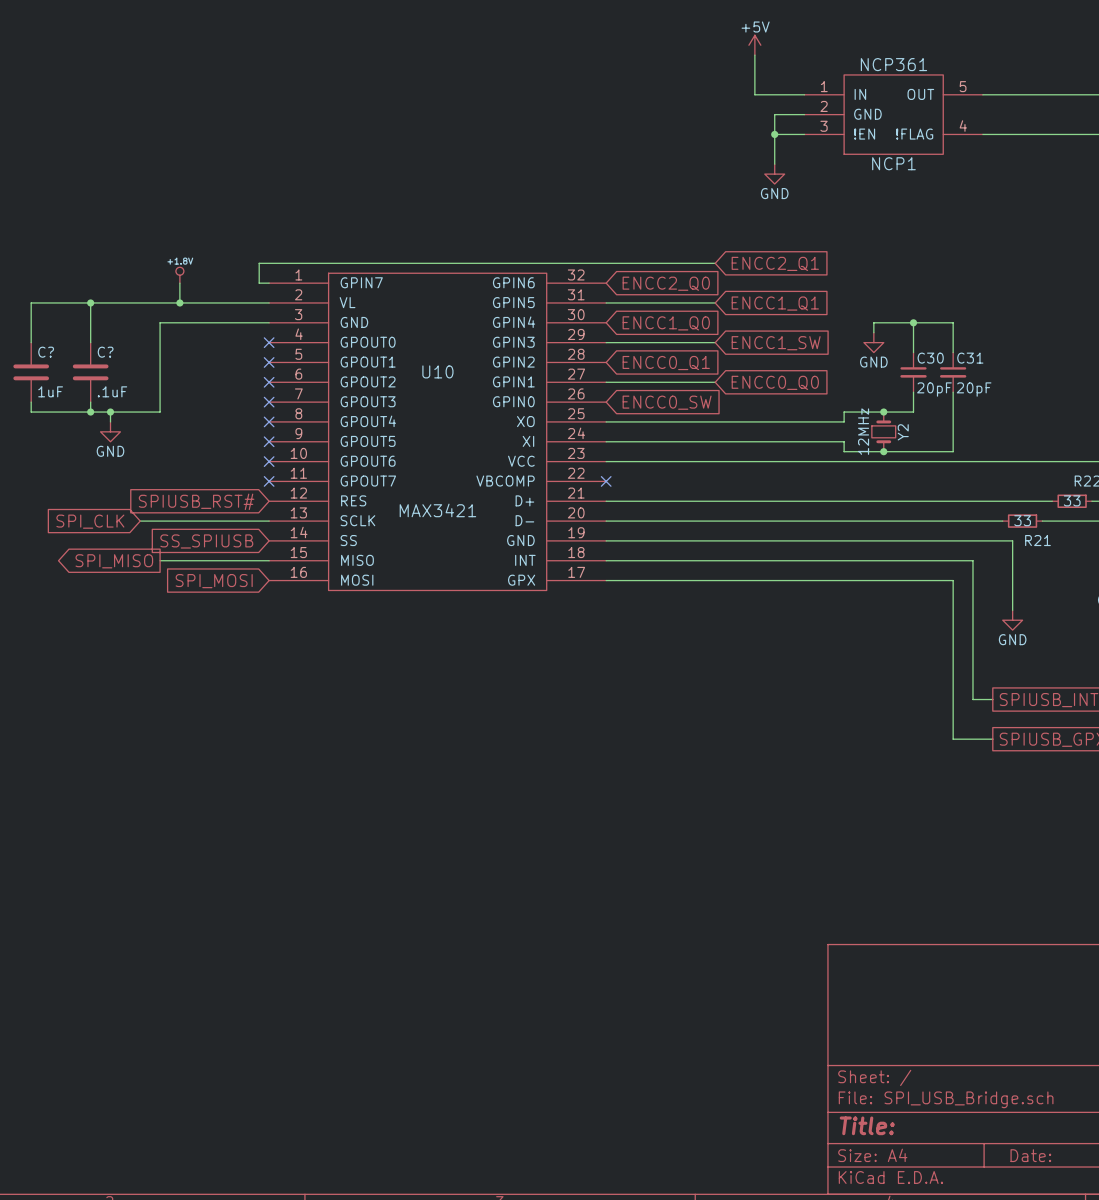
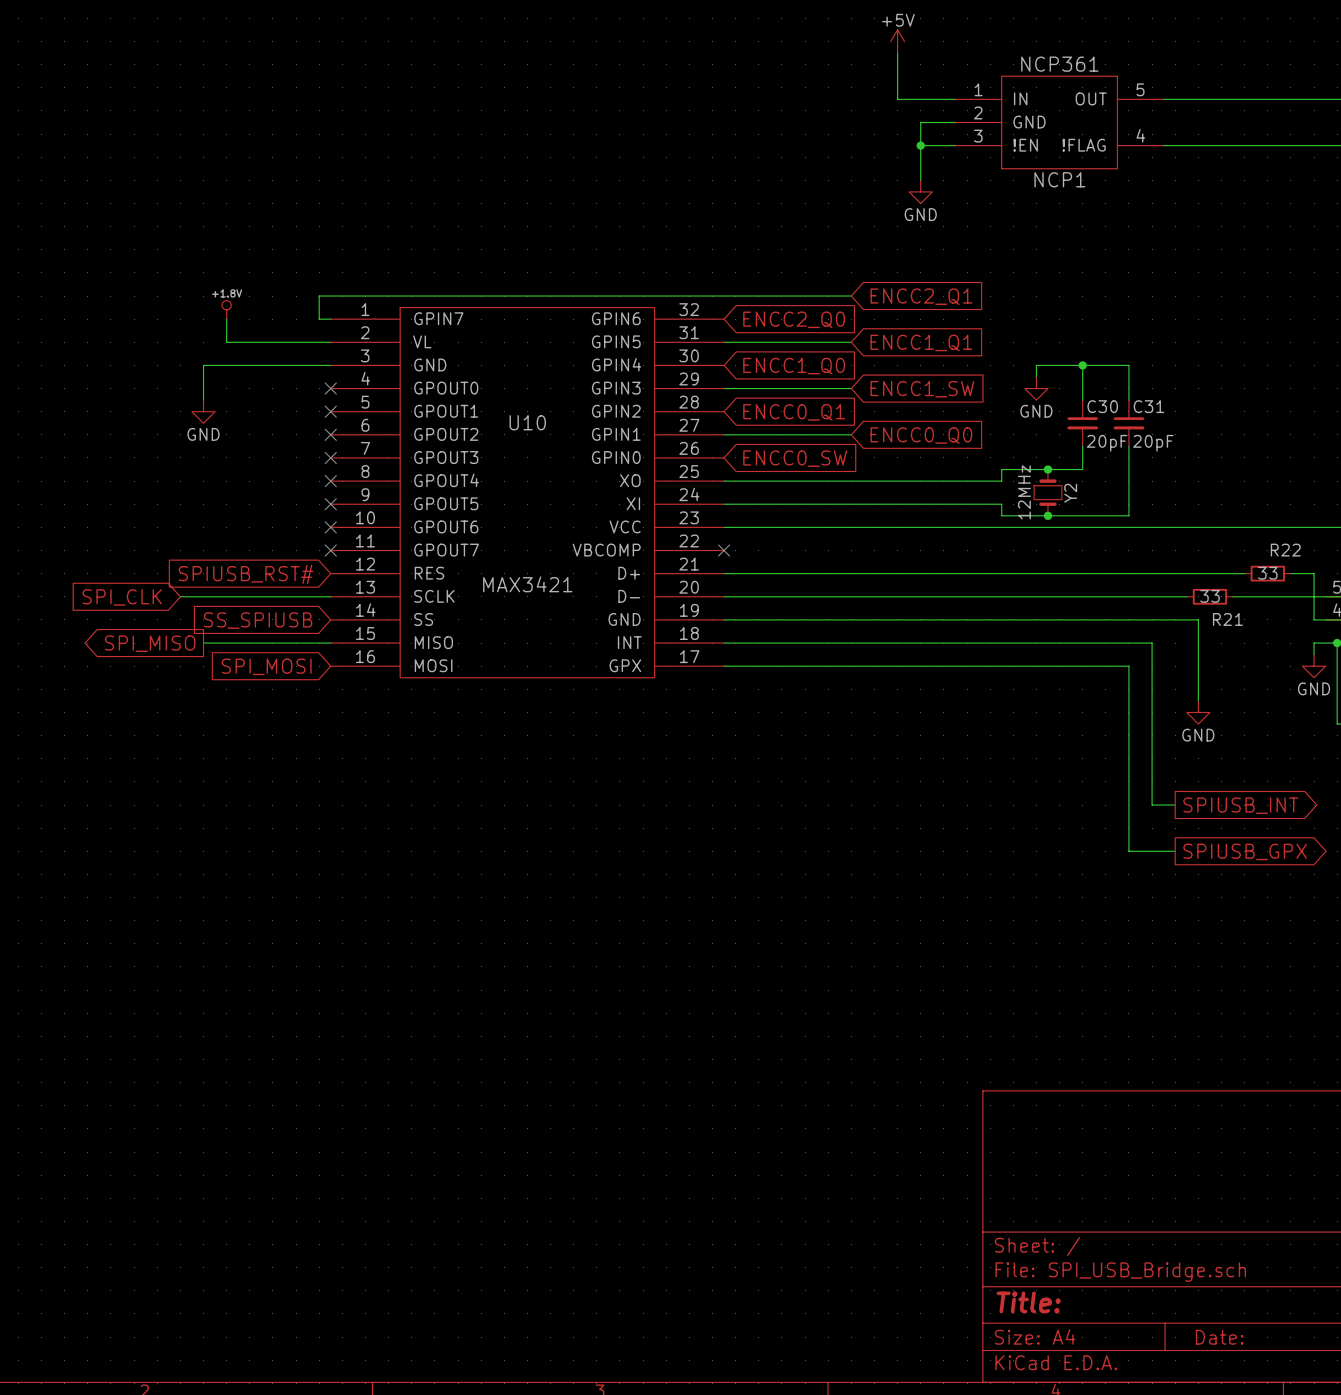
wire: (90, 302) (90, 342) -> none
junction: (90, 302) -> none
wire: (179, 302) (31, 302) (31, 342) -> none
junction: (179, 302) -> none
wire: (160, 352) (160, 412) (31, 412) (31, 402) -> none
C?: 1uF (31, 372) -> none
C?: .1uF (90, 372) -> none
wire: (90, 402) (90, 412) -> none
junction: (90, 412) -> none
wire: (110, 412) (110, 421) -> none
junction: (110, 412) -> none
power symbol position: GND (110, 431) -> GND (203, 411)

